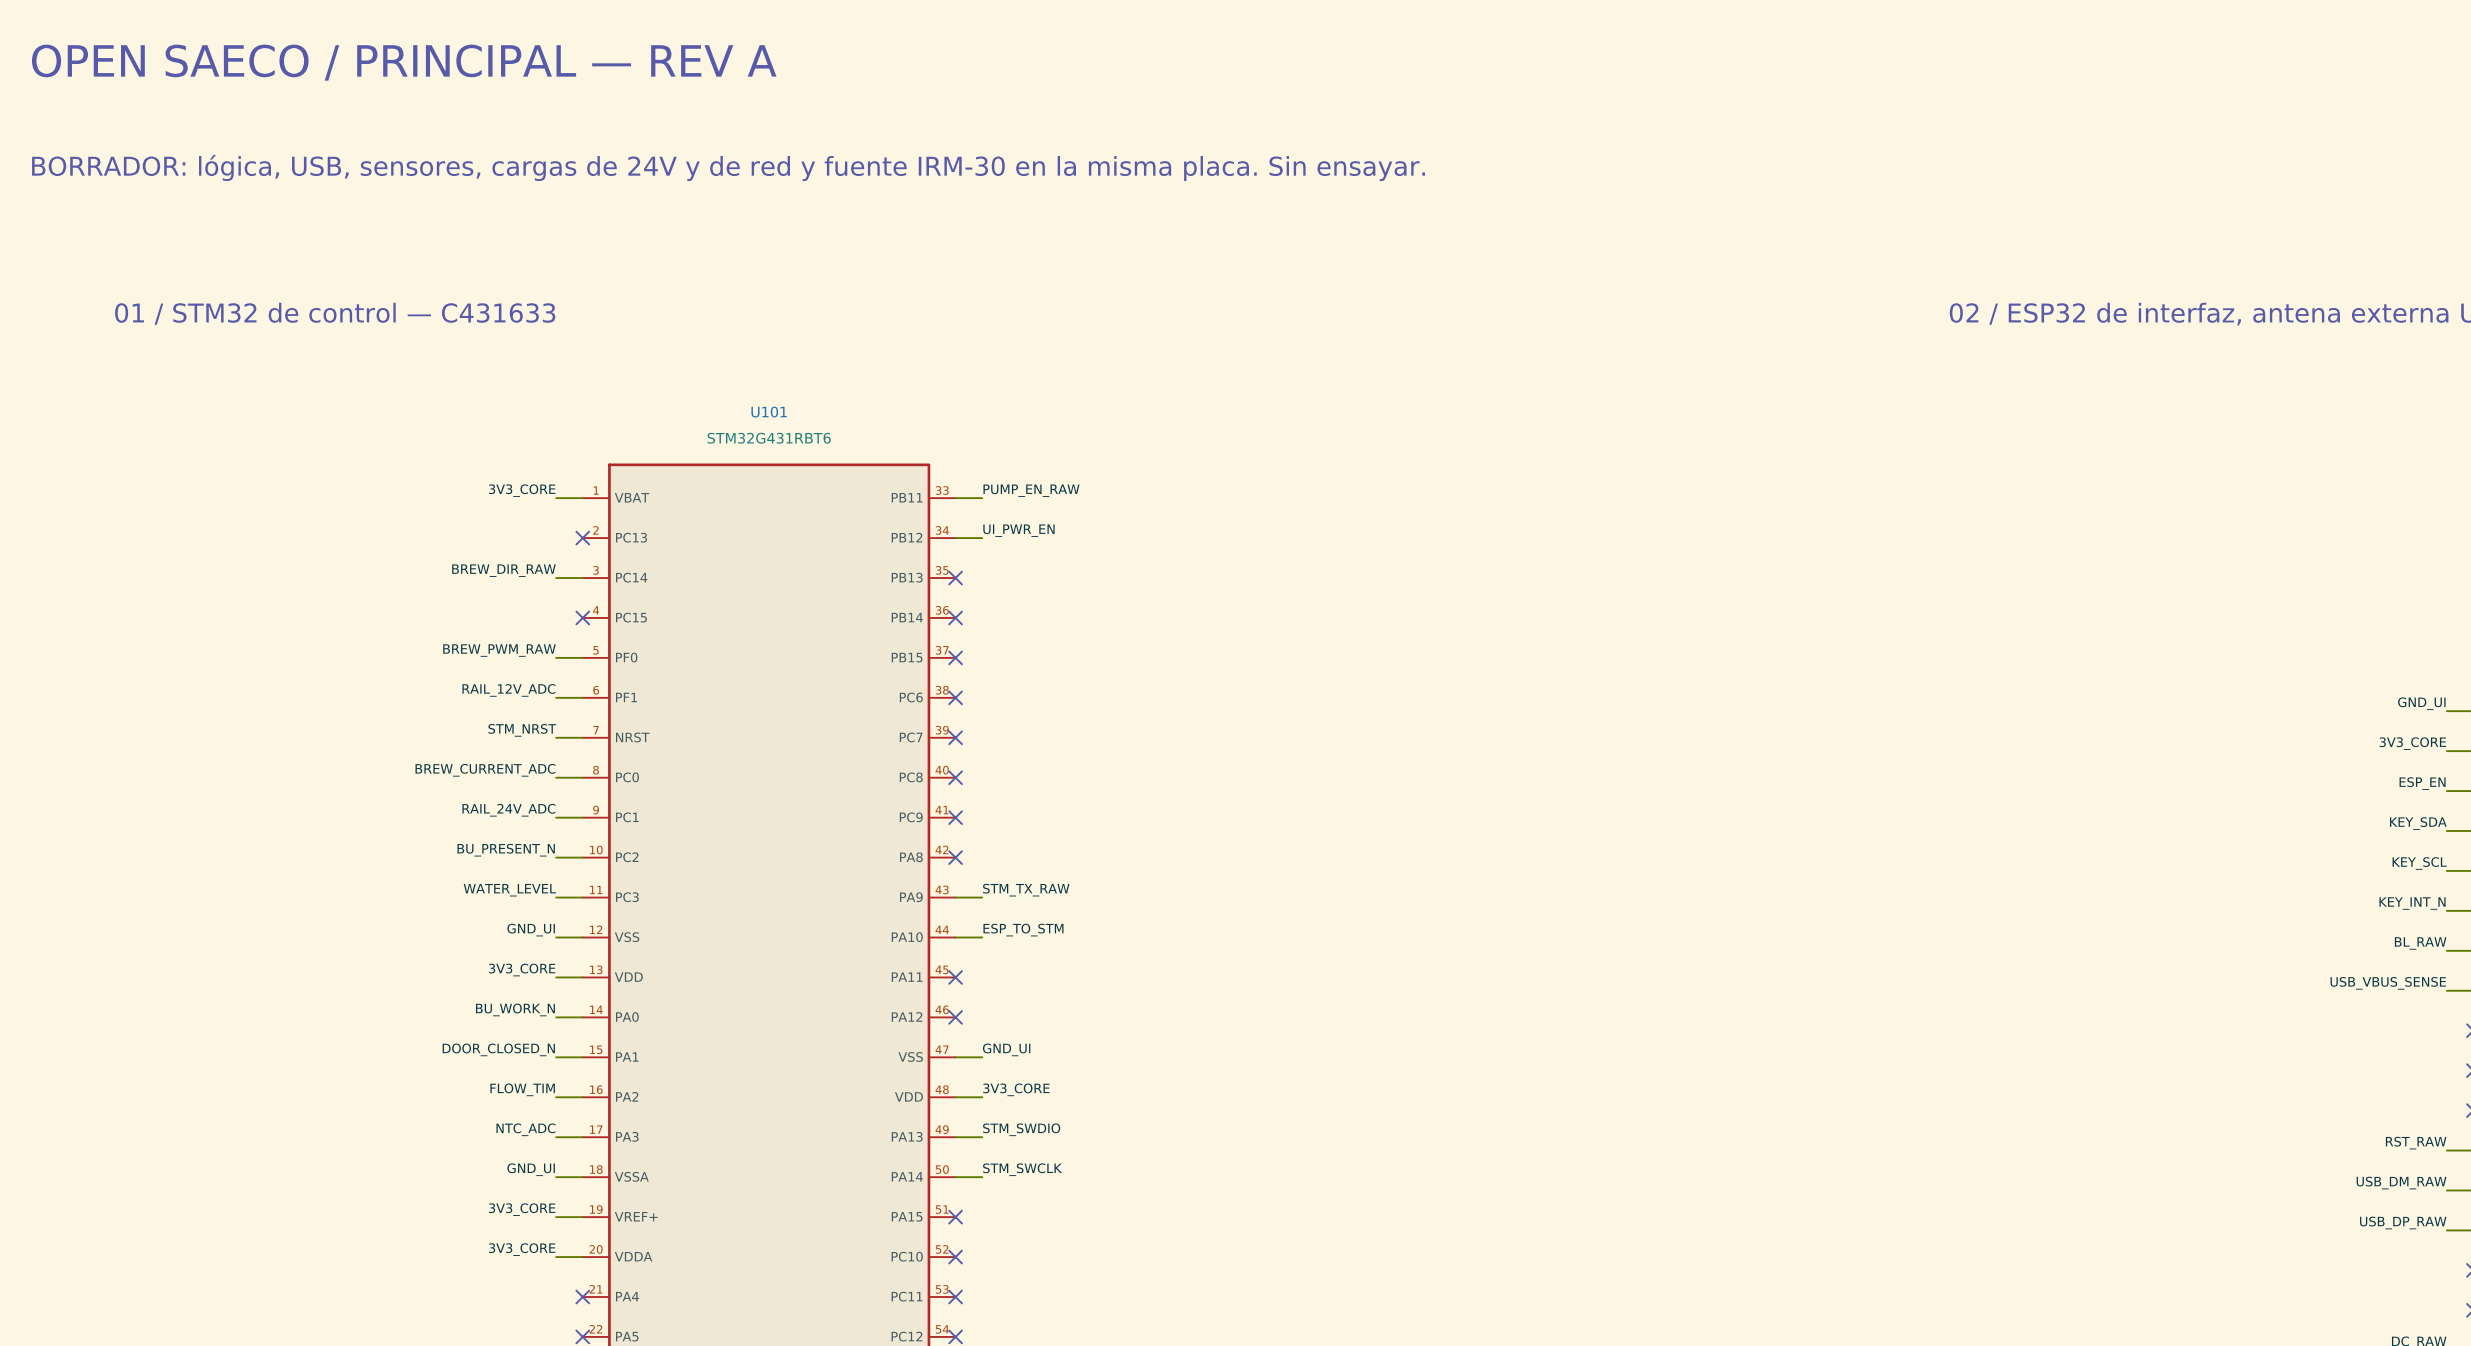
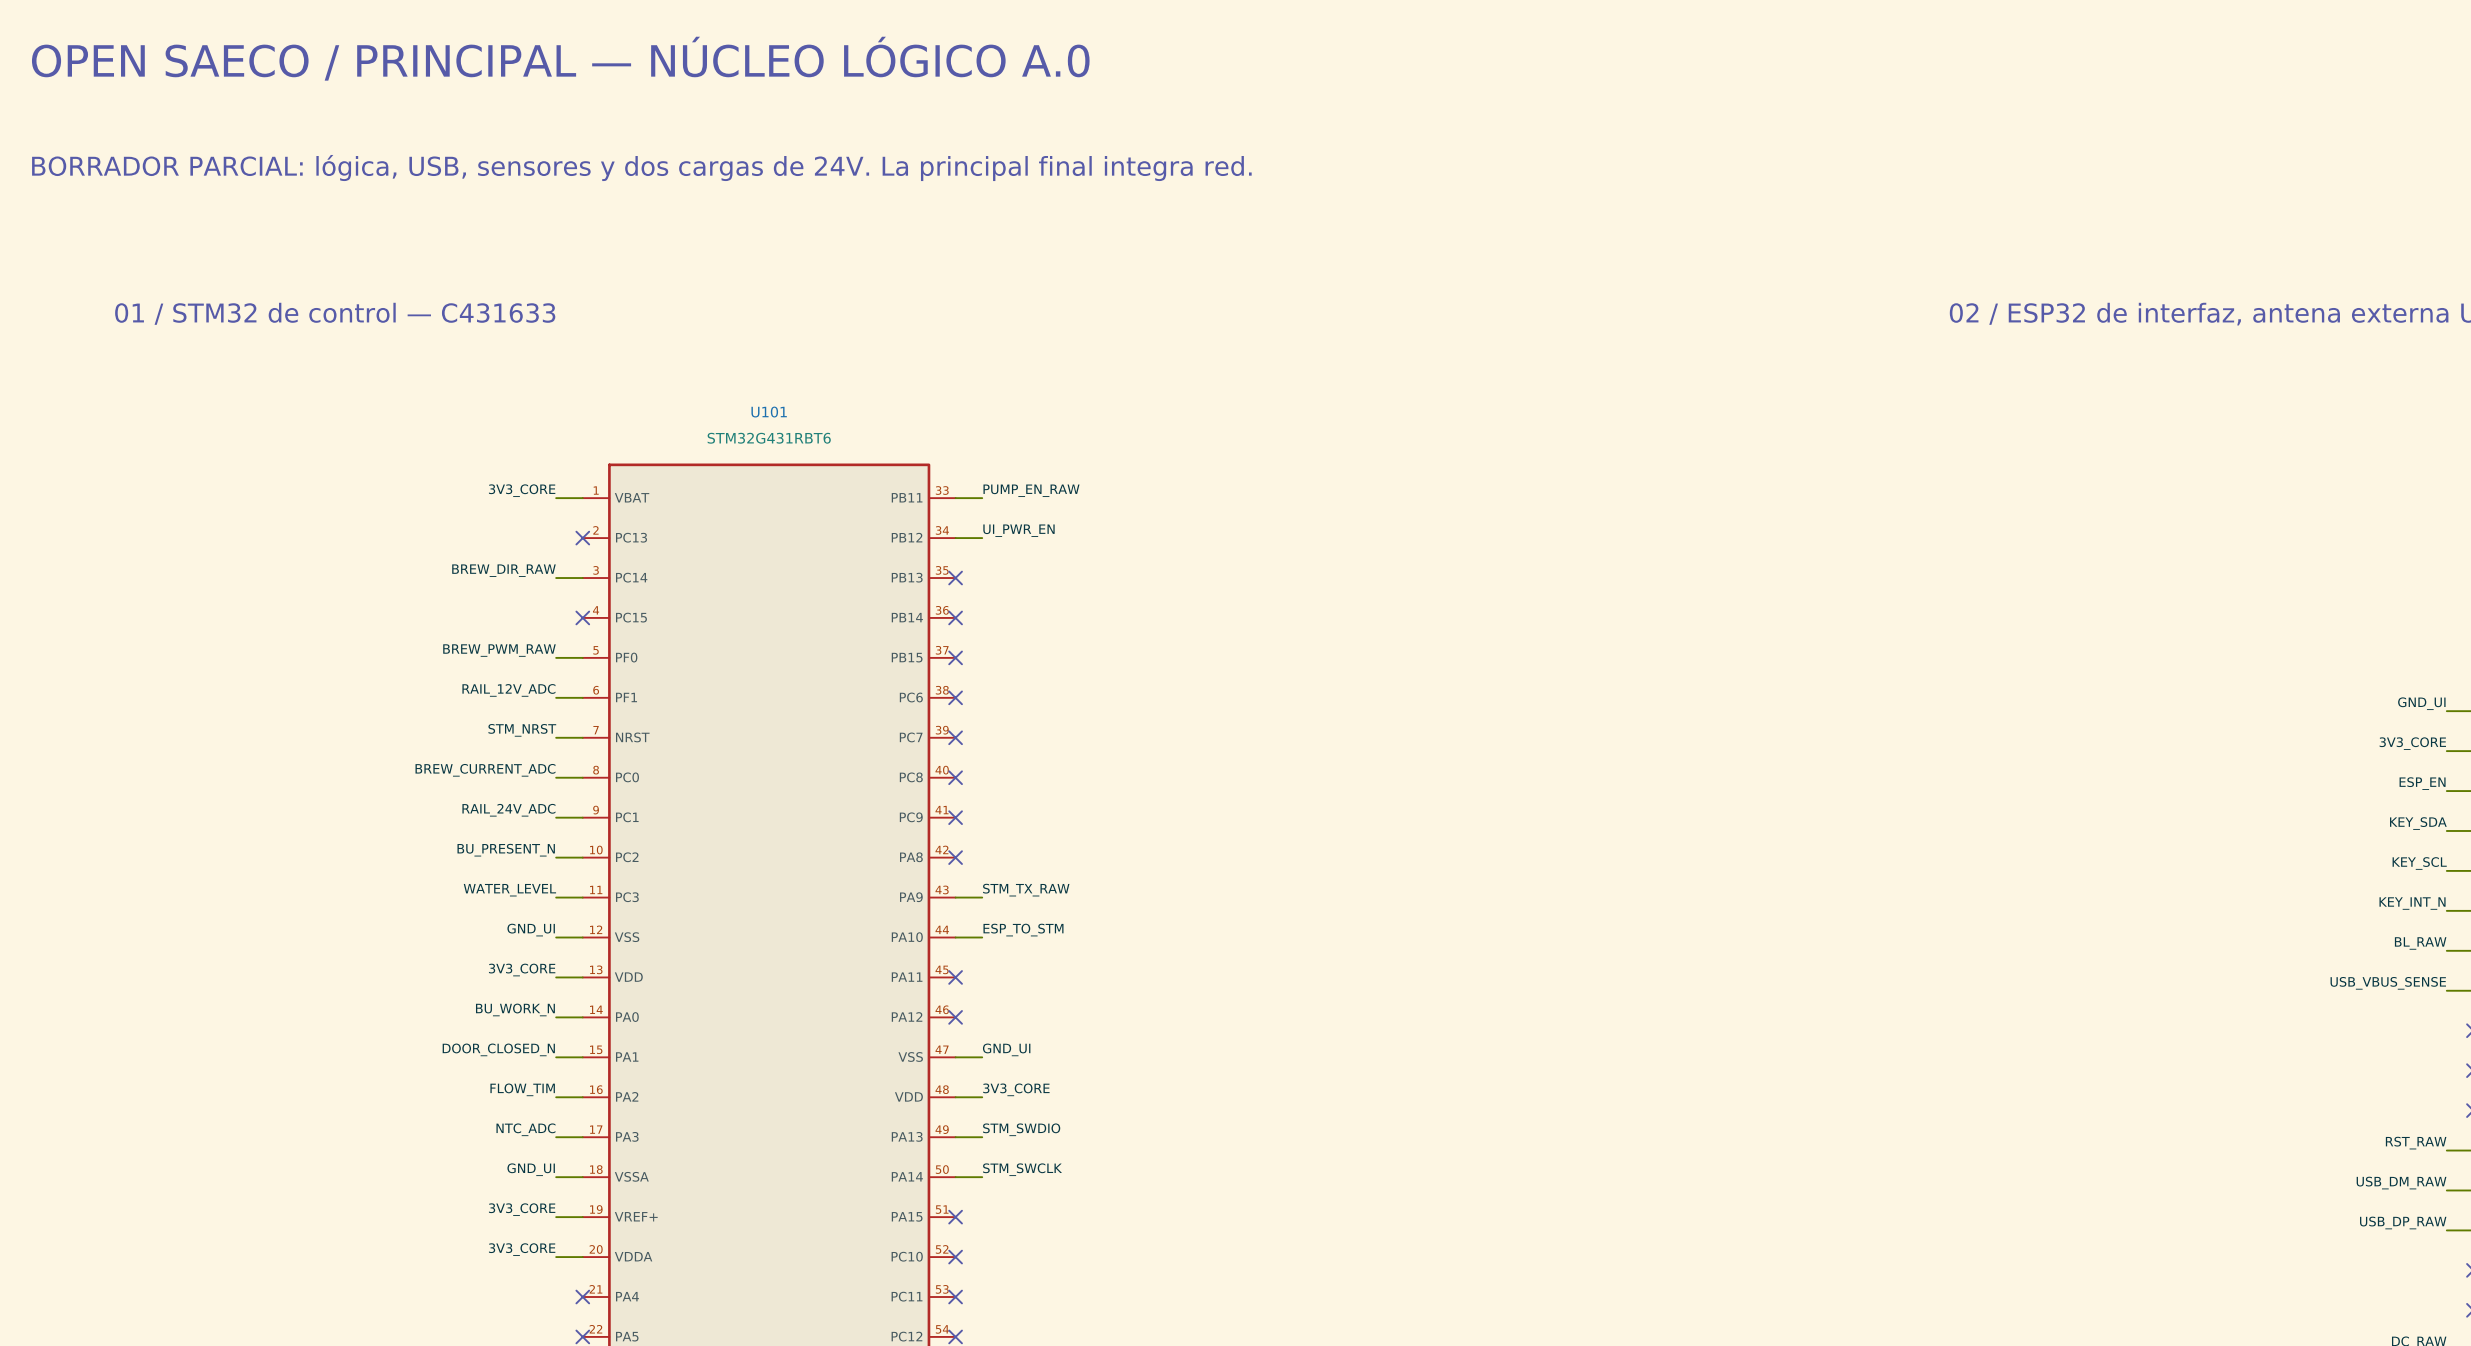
text: OPEN SAECO / PRINCIPAL — REV A (404, 62) -> OPEN SAECO / PRINCIPAL — NÚCLEO LÓGICO A.0 (560, 58)
text: BORRADOR: lógica, USB, sensores, cargas de 24V y de red y fuente IRM-30 en la misma placa. Sin ensayar. (728, 168) -> BORRADOR PARCIAL: lógica, USB, sensores y dos cargas de 24V. La principal final integra red. (641, 168)

